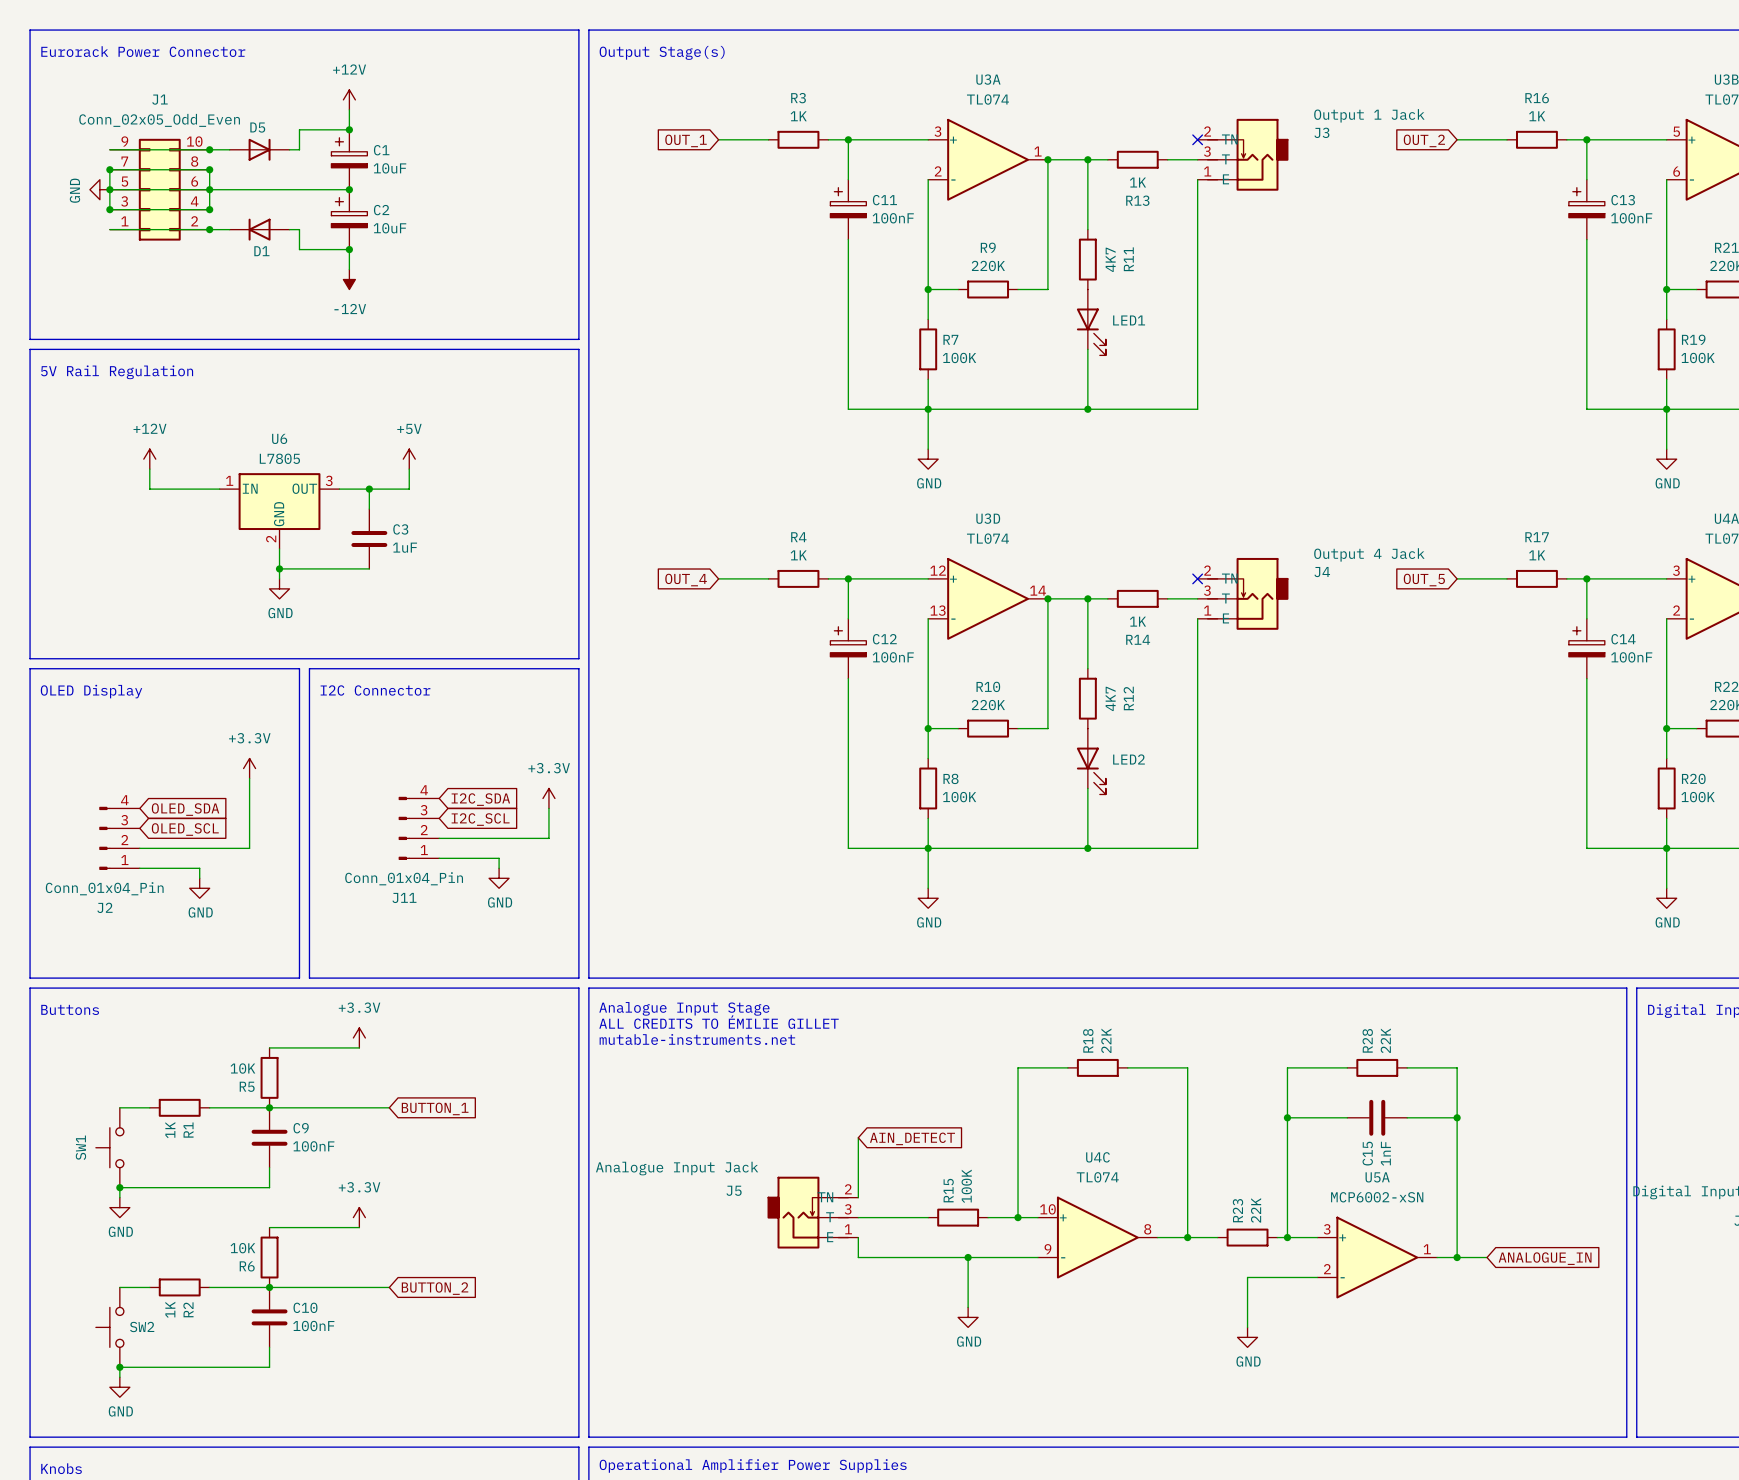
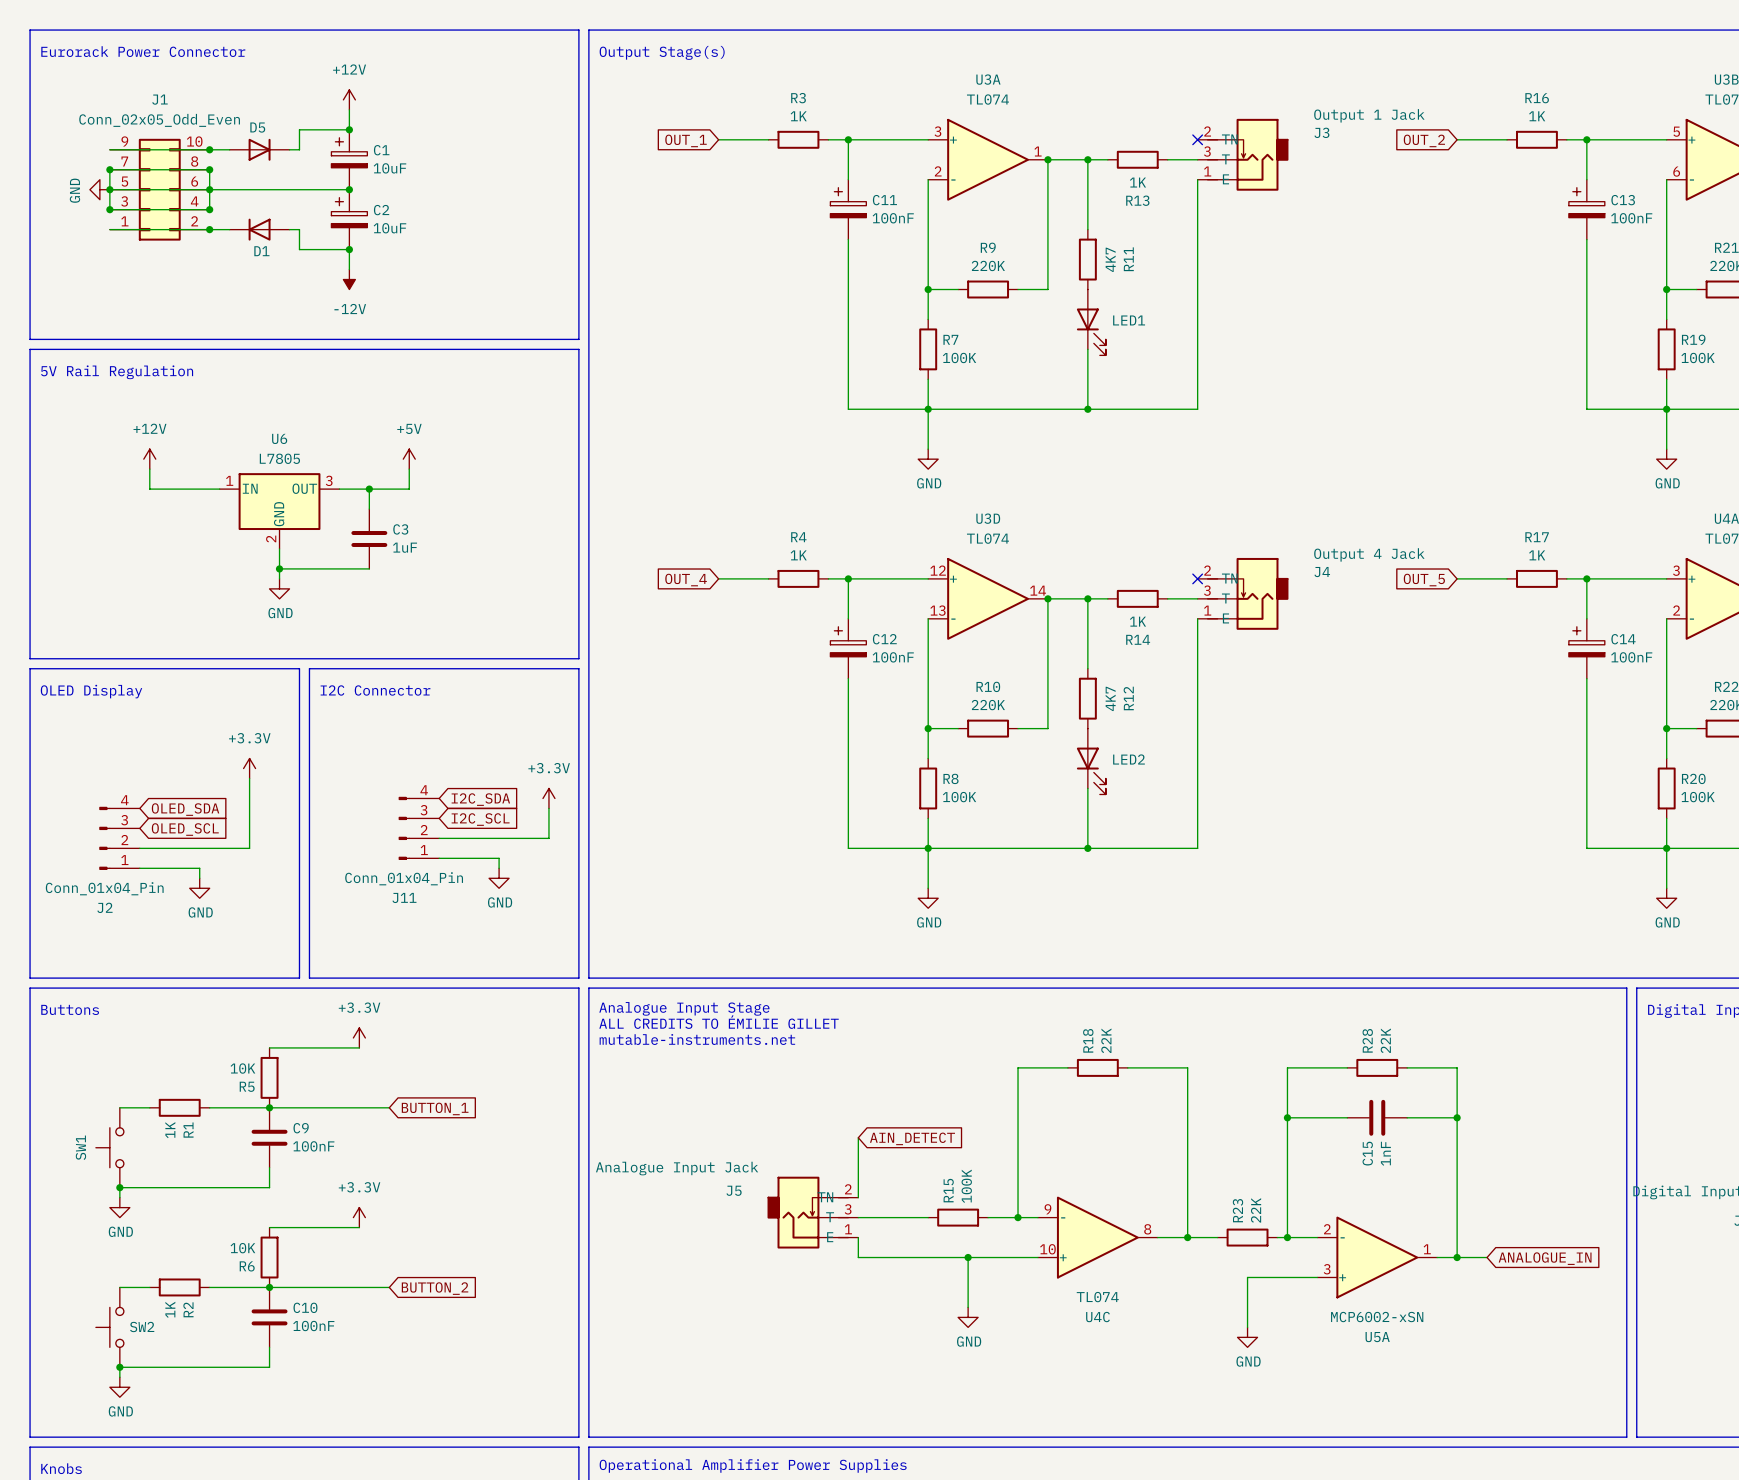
U4C flip: as is (1097, 1237) -> up-down (1097, 1237)
U5A flip: as is (1377, 1257) -> up-down (1377, 1257)

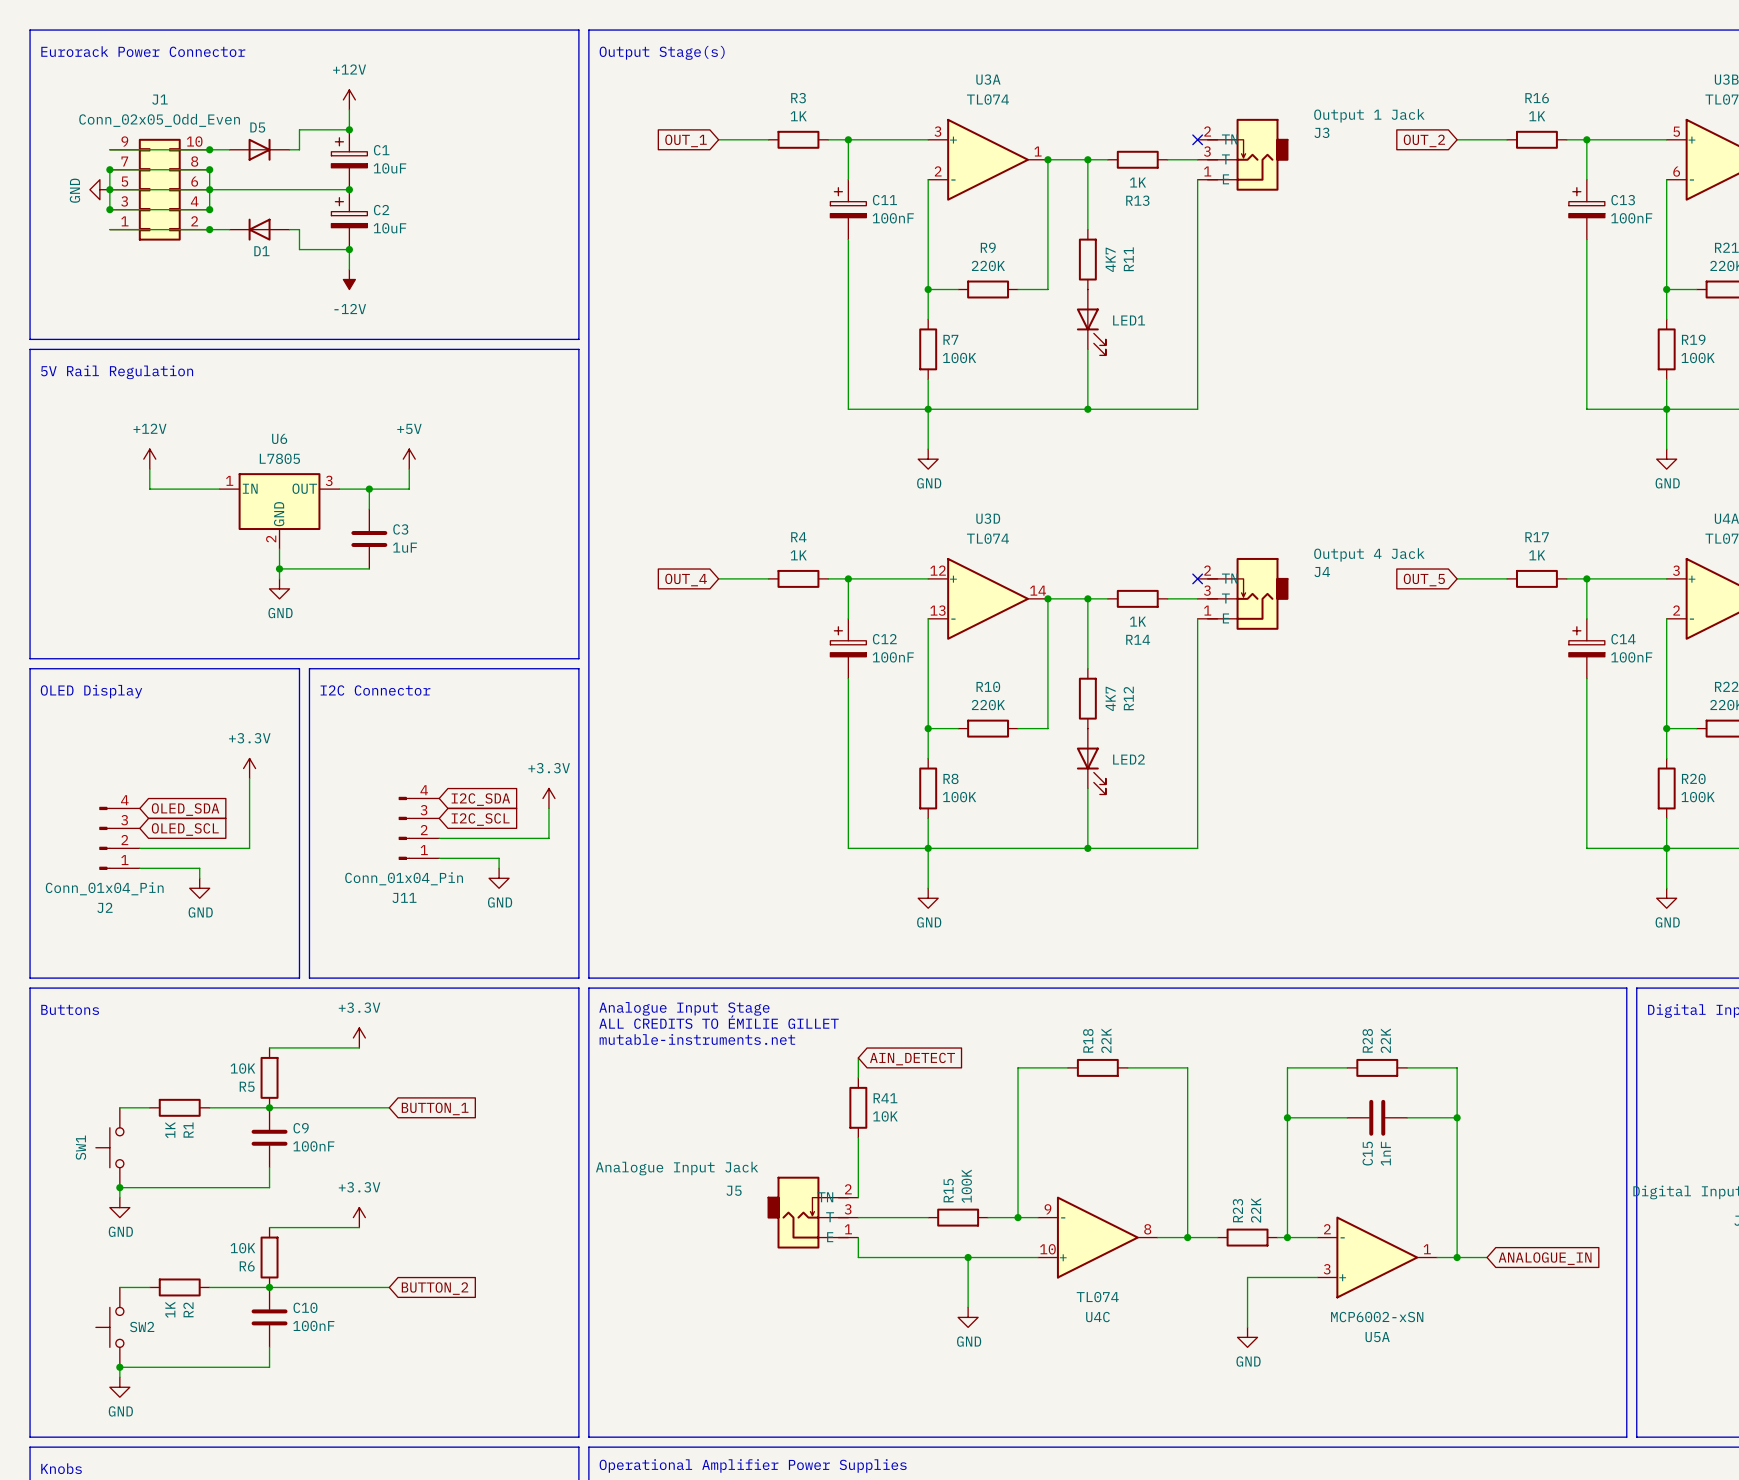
wire: none -> (858, 1057) (858, 1077)
R41: none -> 10K (858, 1107)
global label position: AIN_DETECT (912, 1138) -> AIN_DETECT (912, 1059)

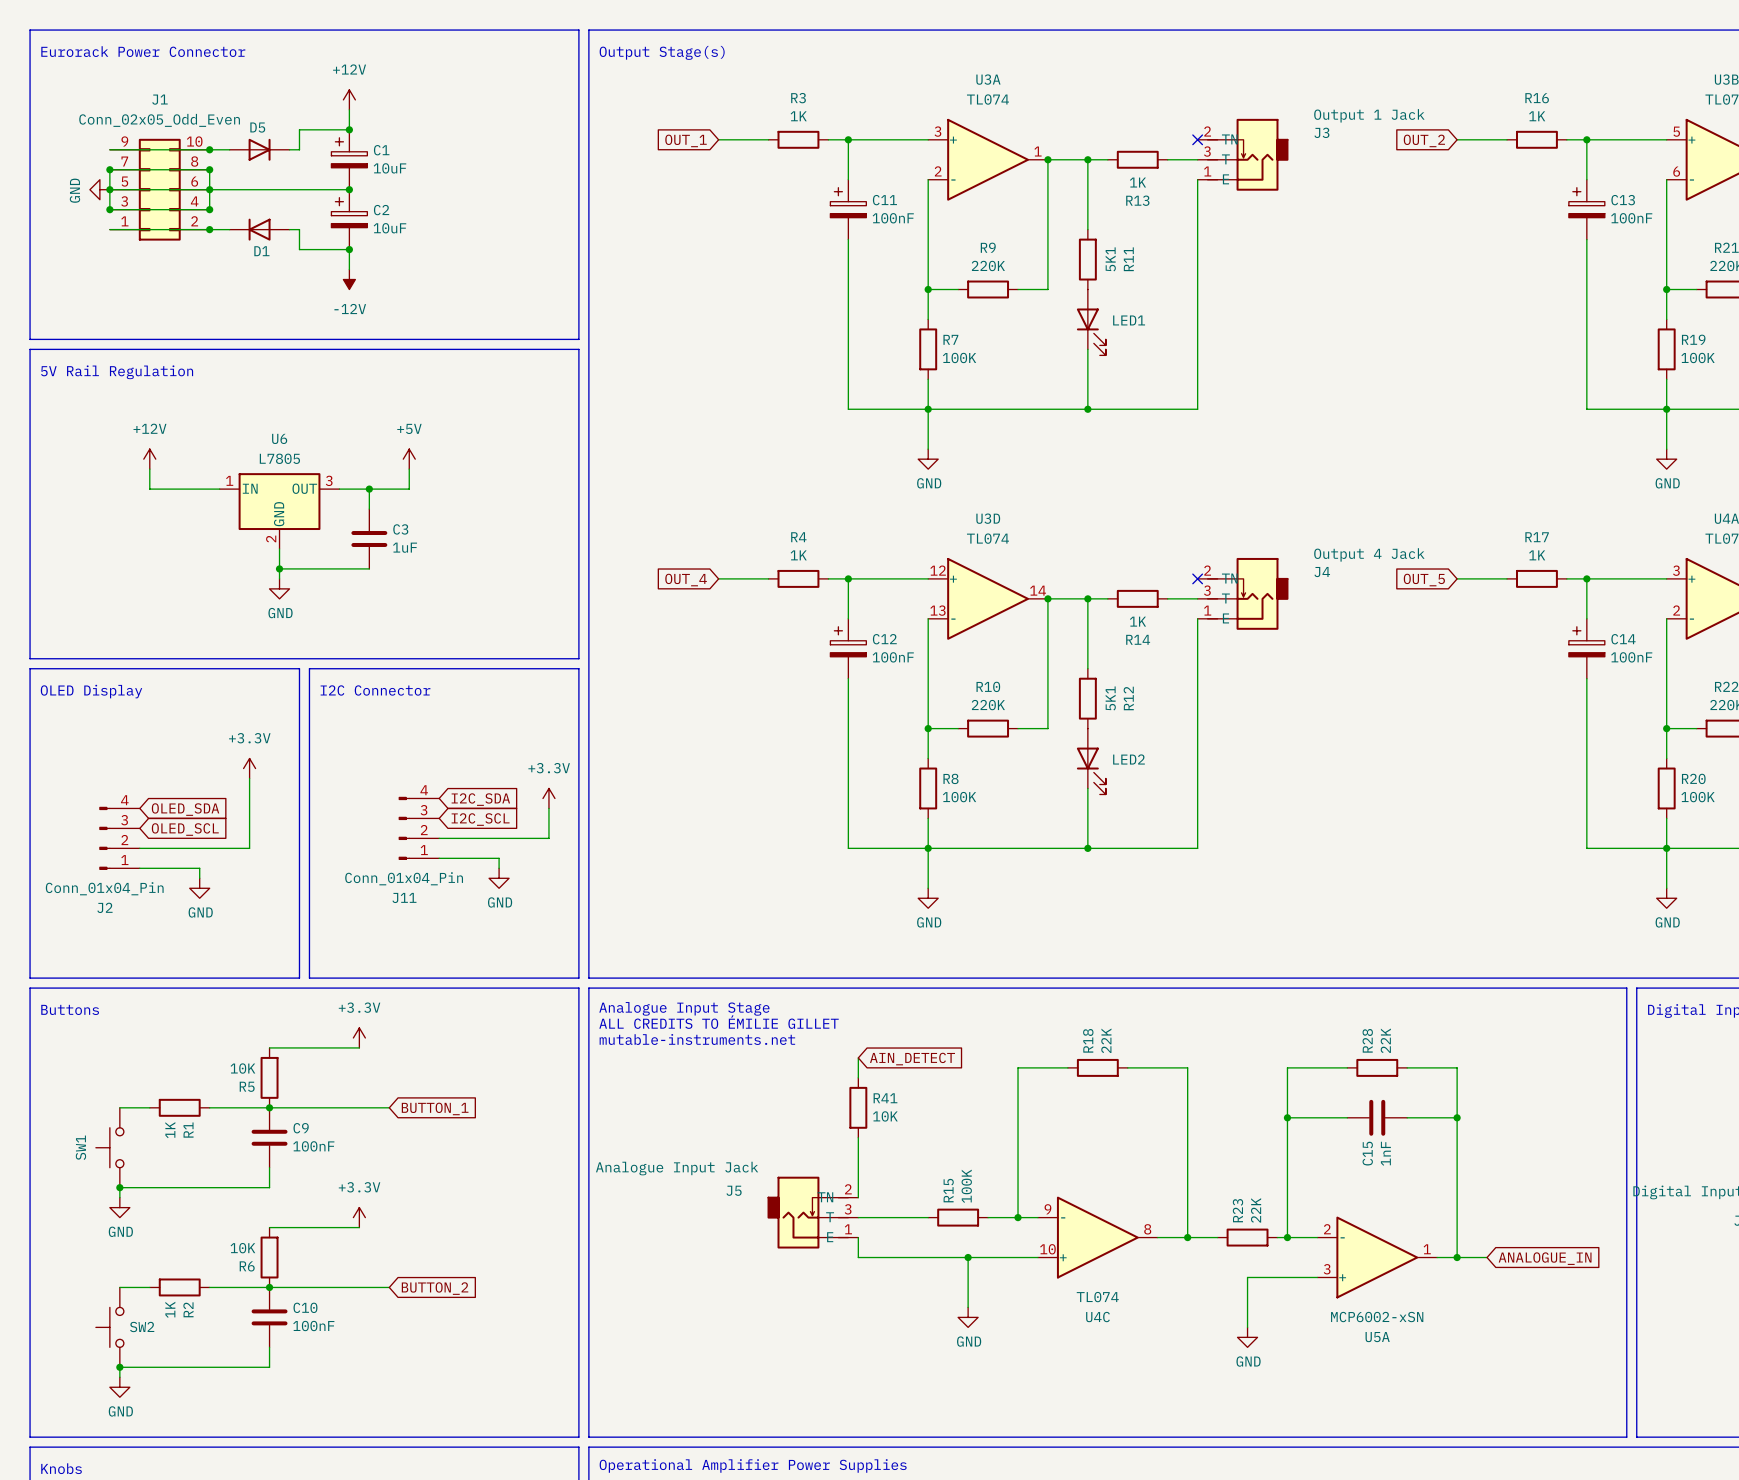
R11 value: 4K7 (1110, 259) -> 5K1 (1110, 259)
R12 value: 4K7 (1110, 698) -> 5K1 (1110, 698)

